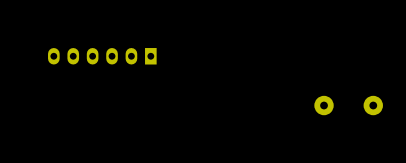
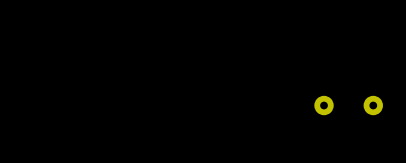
part: (102, 56) -> none

